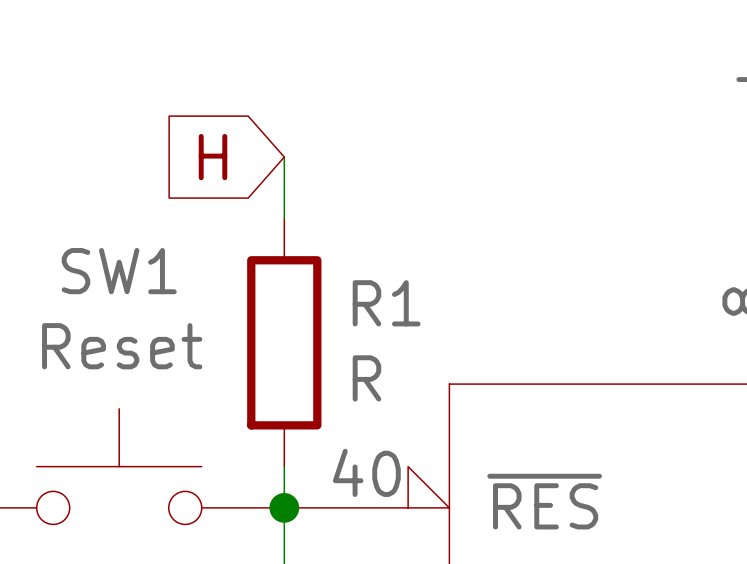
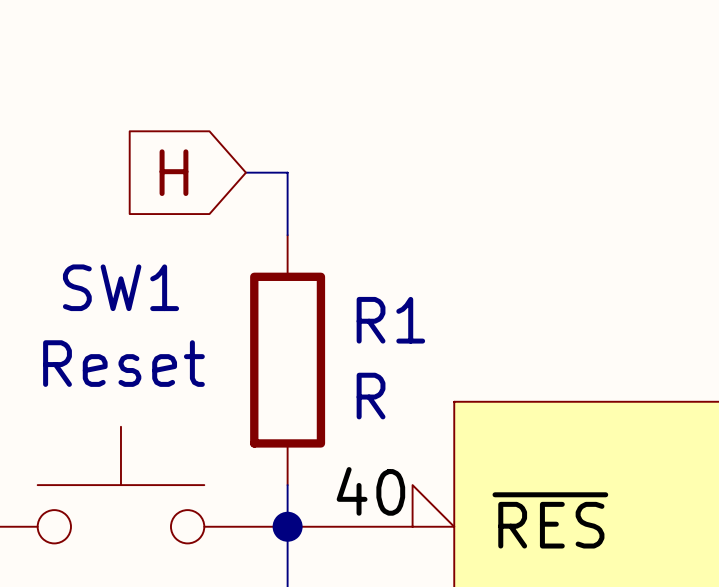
global label position: H (213, 157) -> H (173, 172)
wire: none -> (245, 172) (287, 172)

